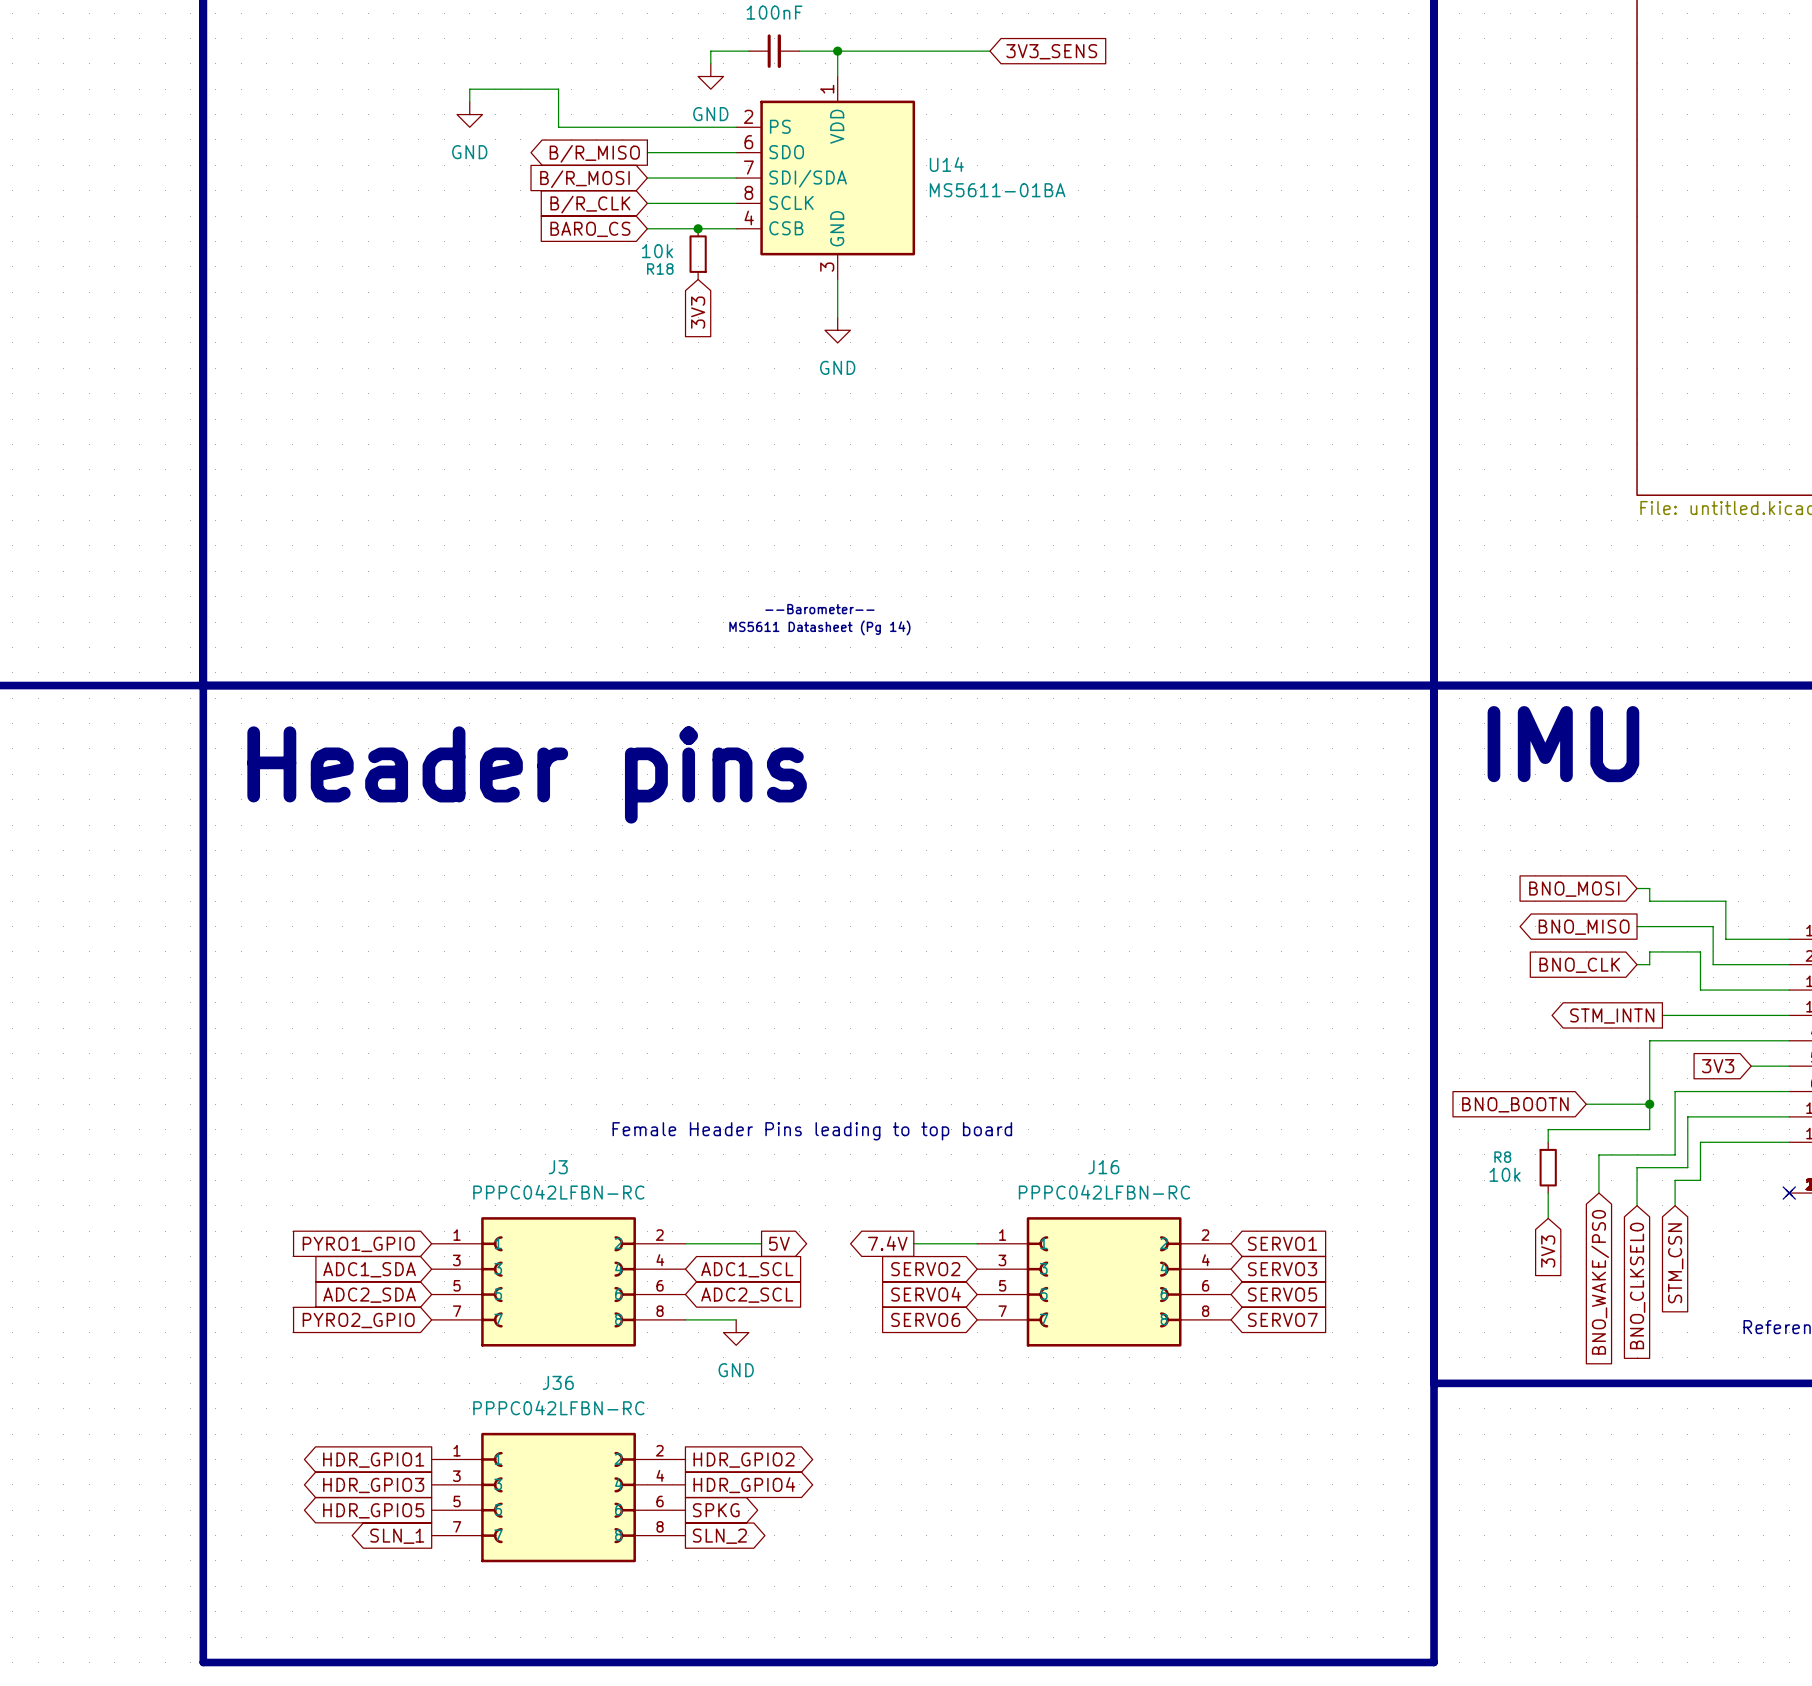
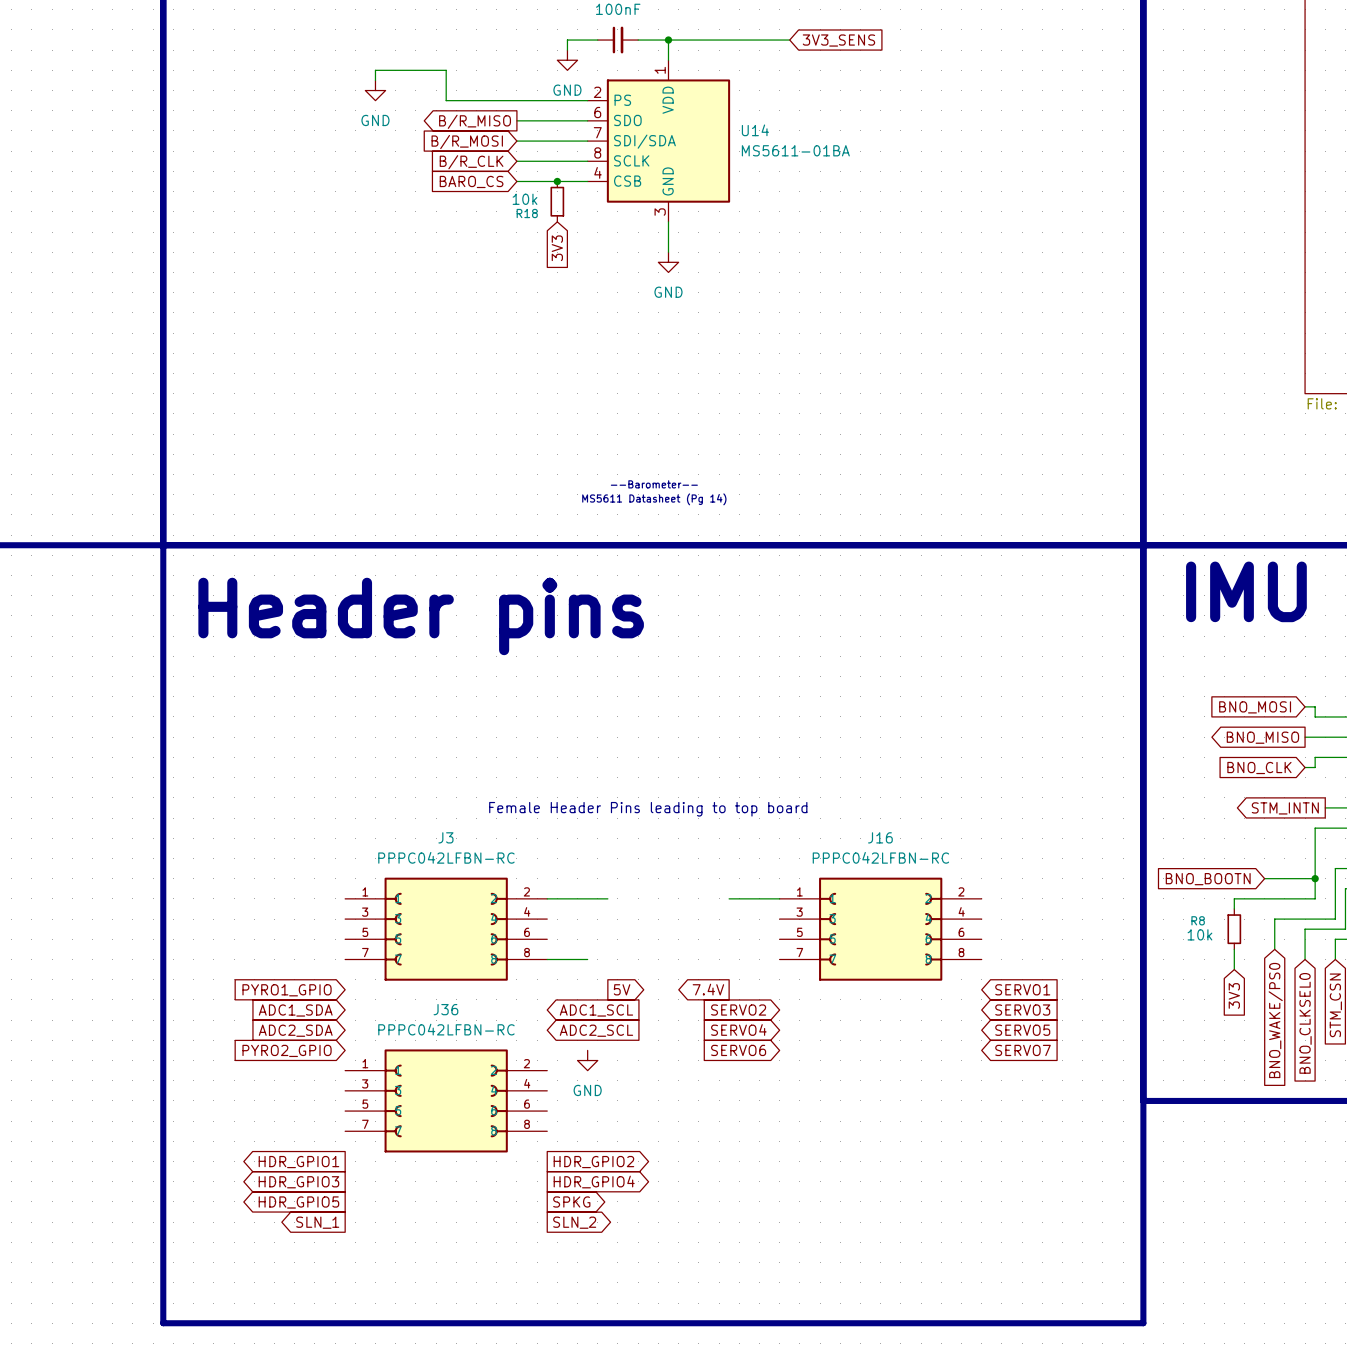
text position: Female Header Pins leading to top board (812, 1131) -> Female Header Pins leading to top board (648, 809)
wire: (685, 1243) (761, 1243) -> (547, 898) (607, 898)
wire: (913, 1243) (977, 1243) -> (729, 898) (779, 898)
J3 position: (558, 1281) -> (446, 929)
J16 position: (1104, 1281) -> (880, 929)
wire: (685, 1319) (736, 1319) -> (547, 959) (587, 959)
J36 position: (558, 1497) -> (446, 1100)

